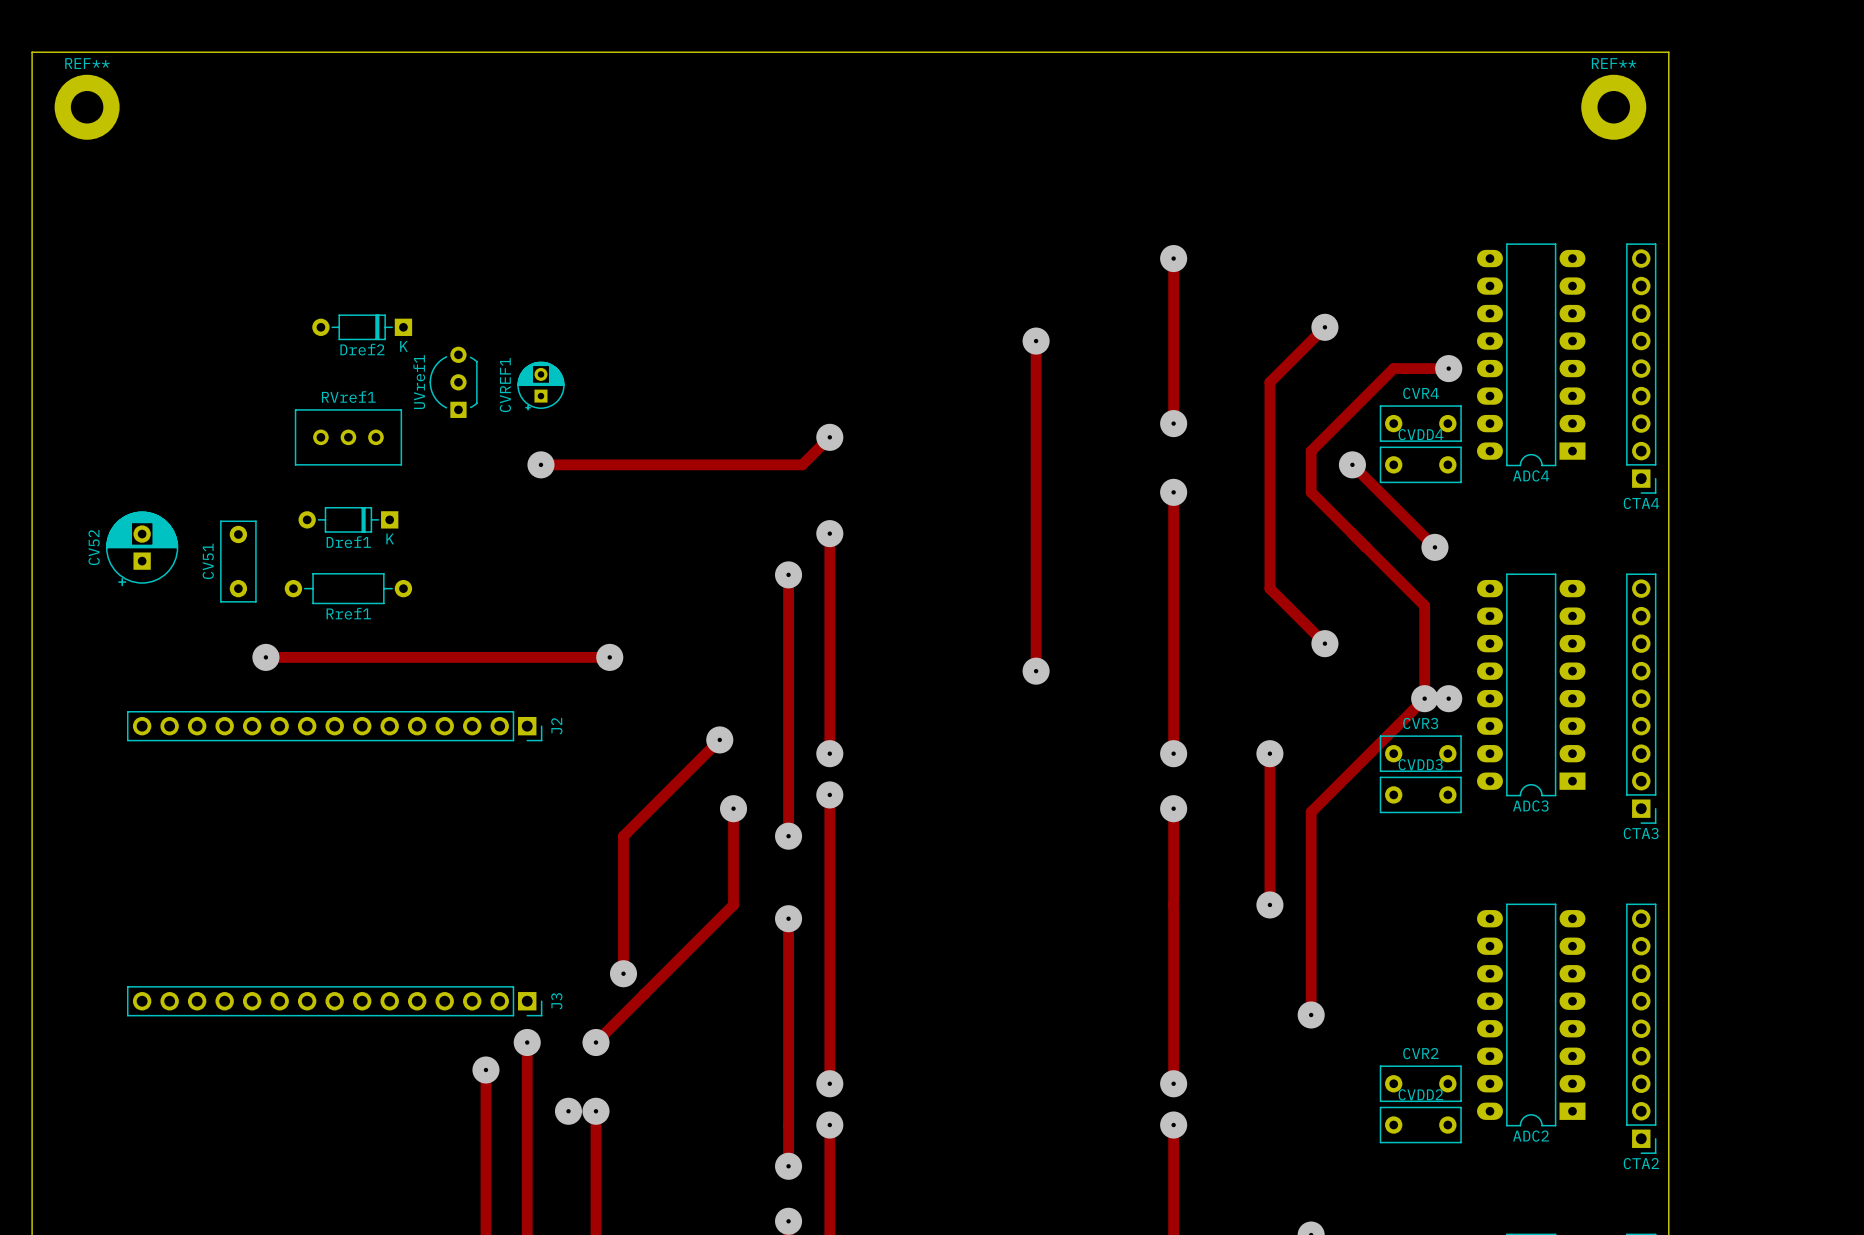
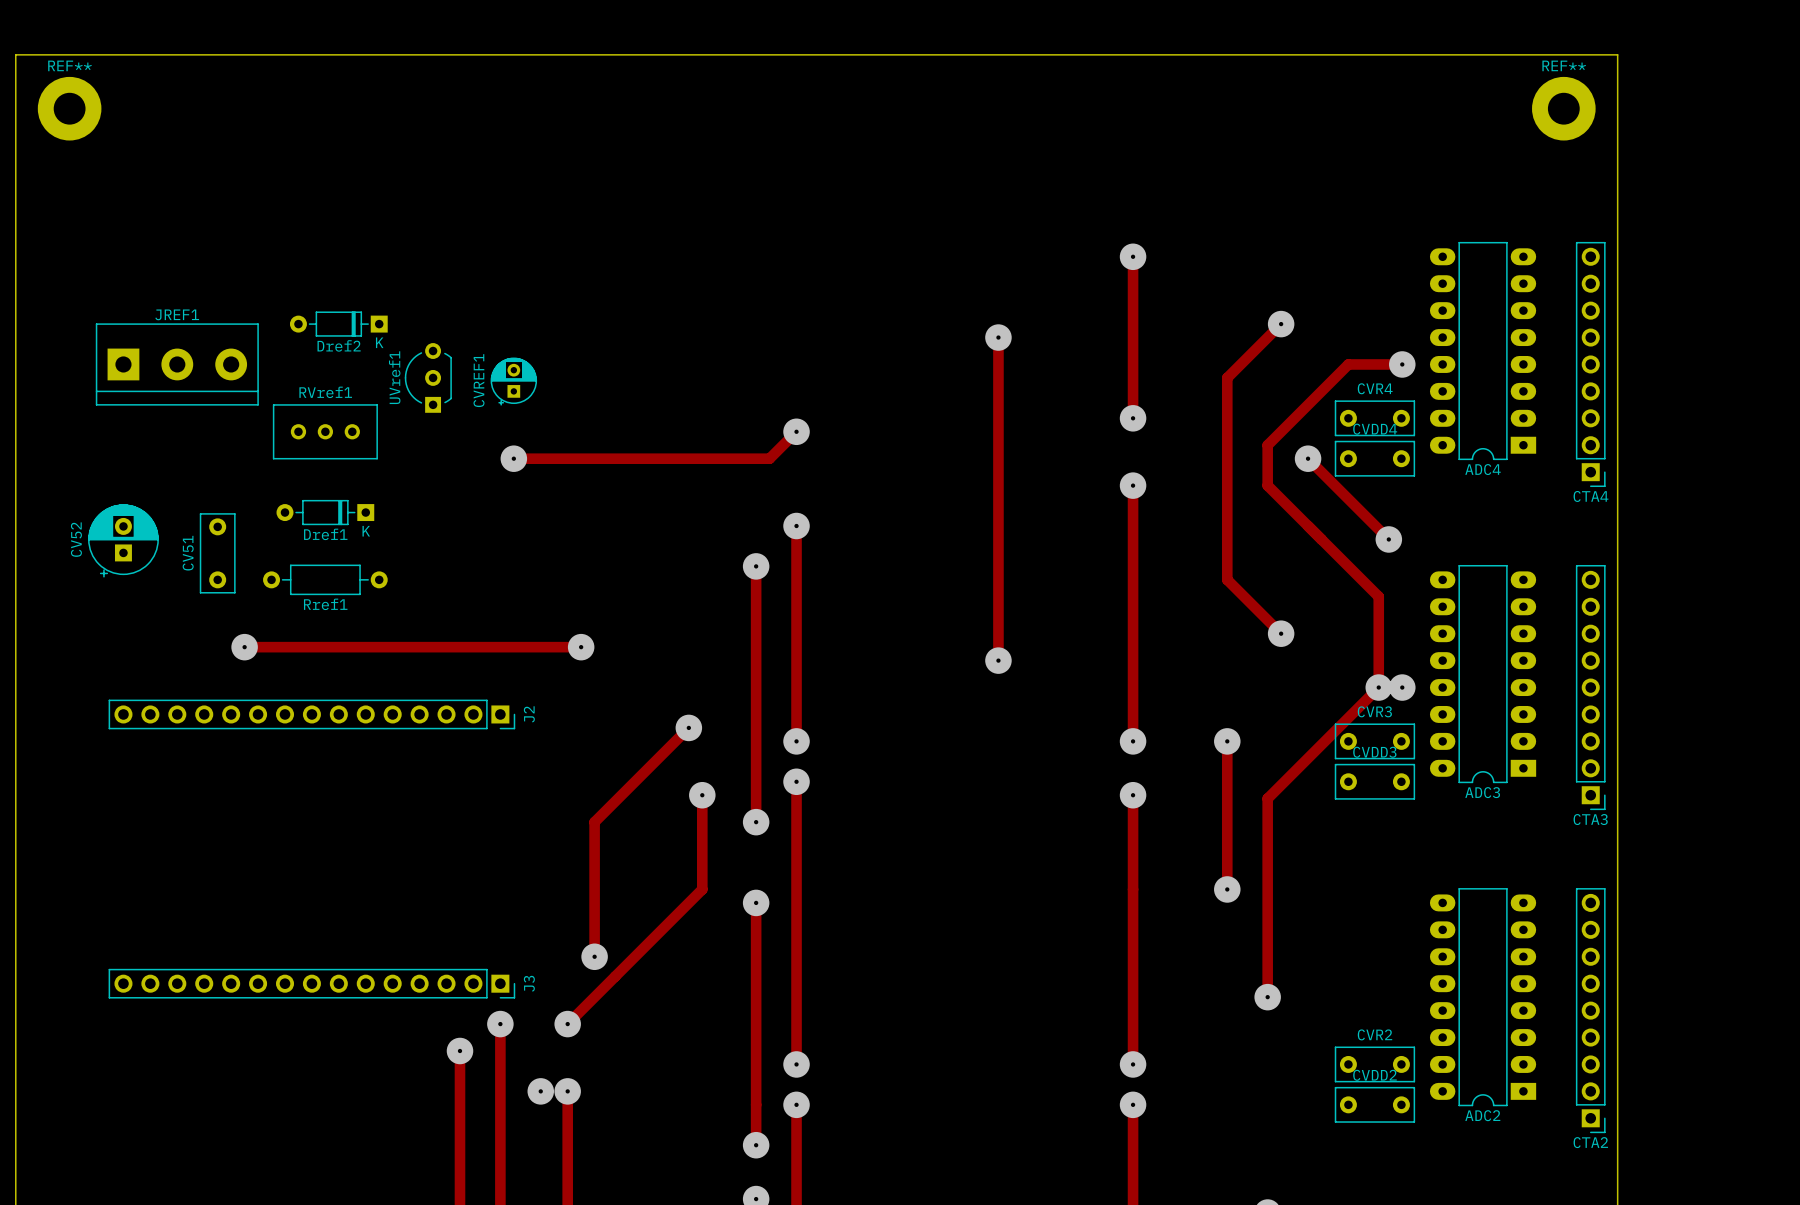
JREF1: none -> (177, 364)

